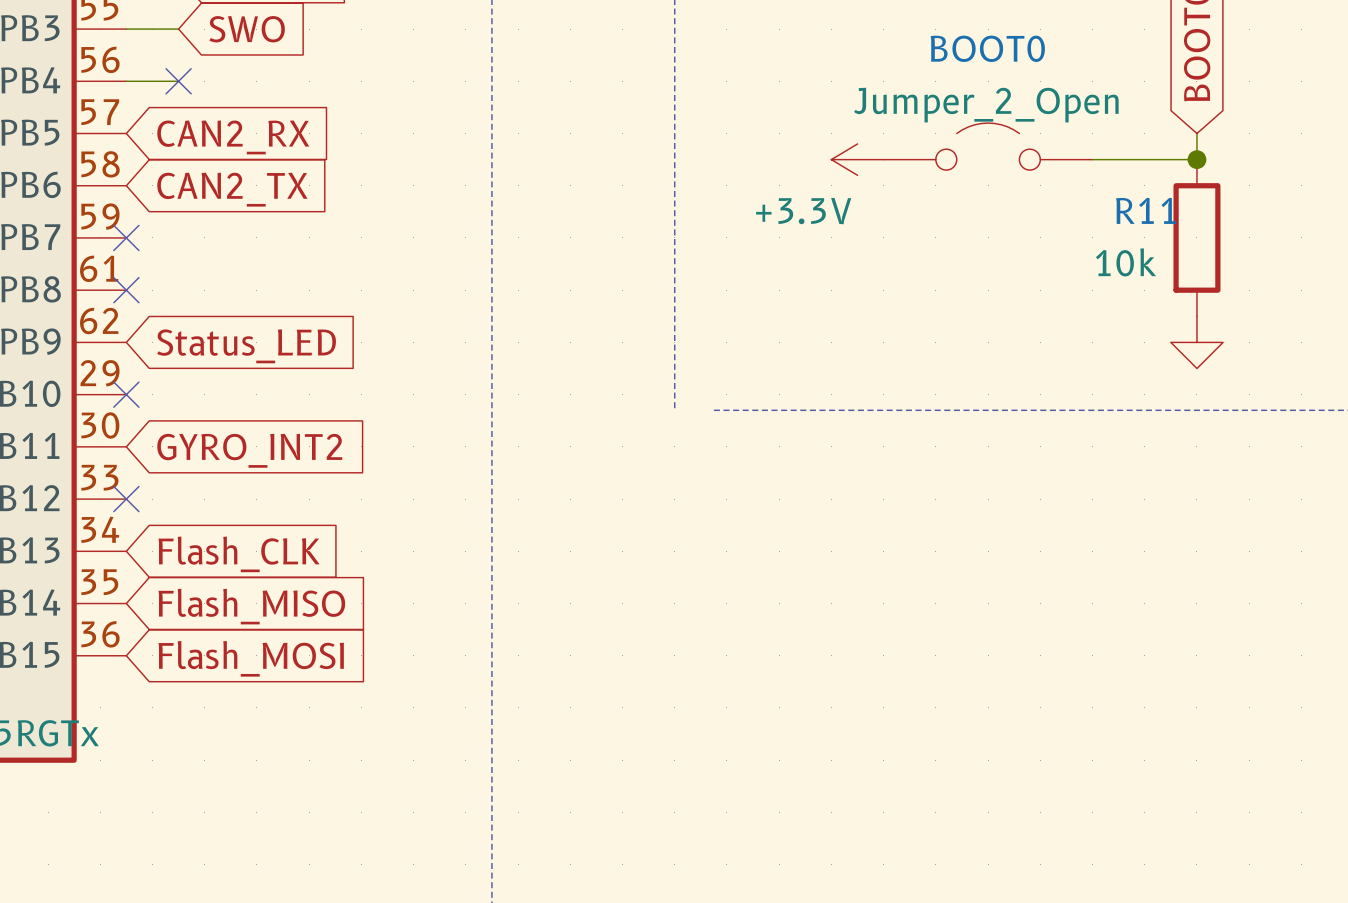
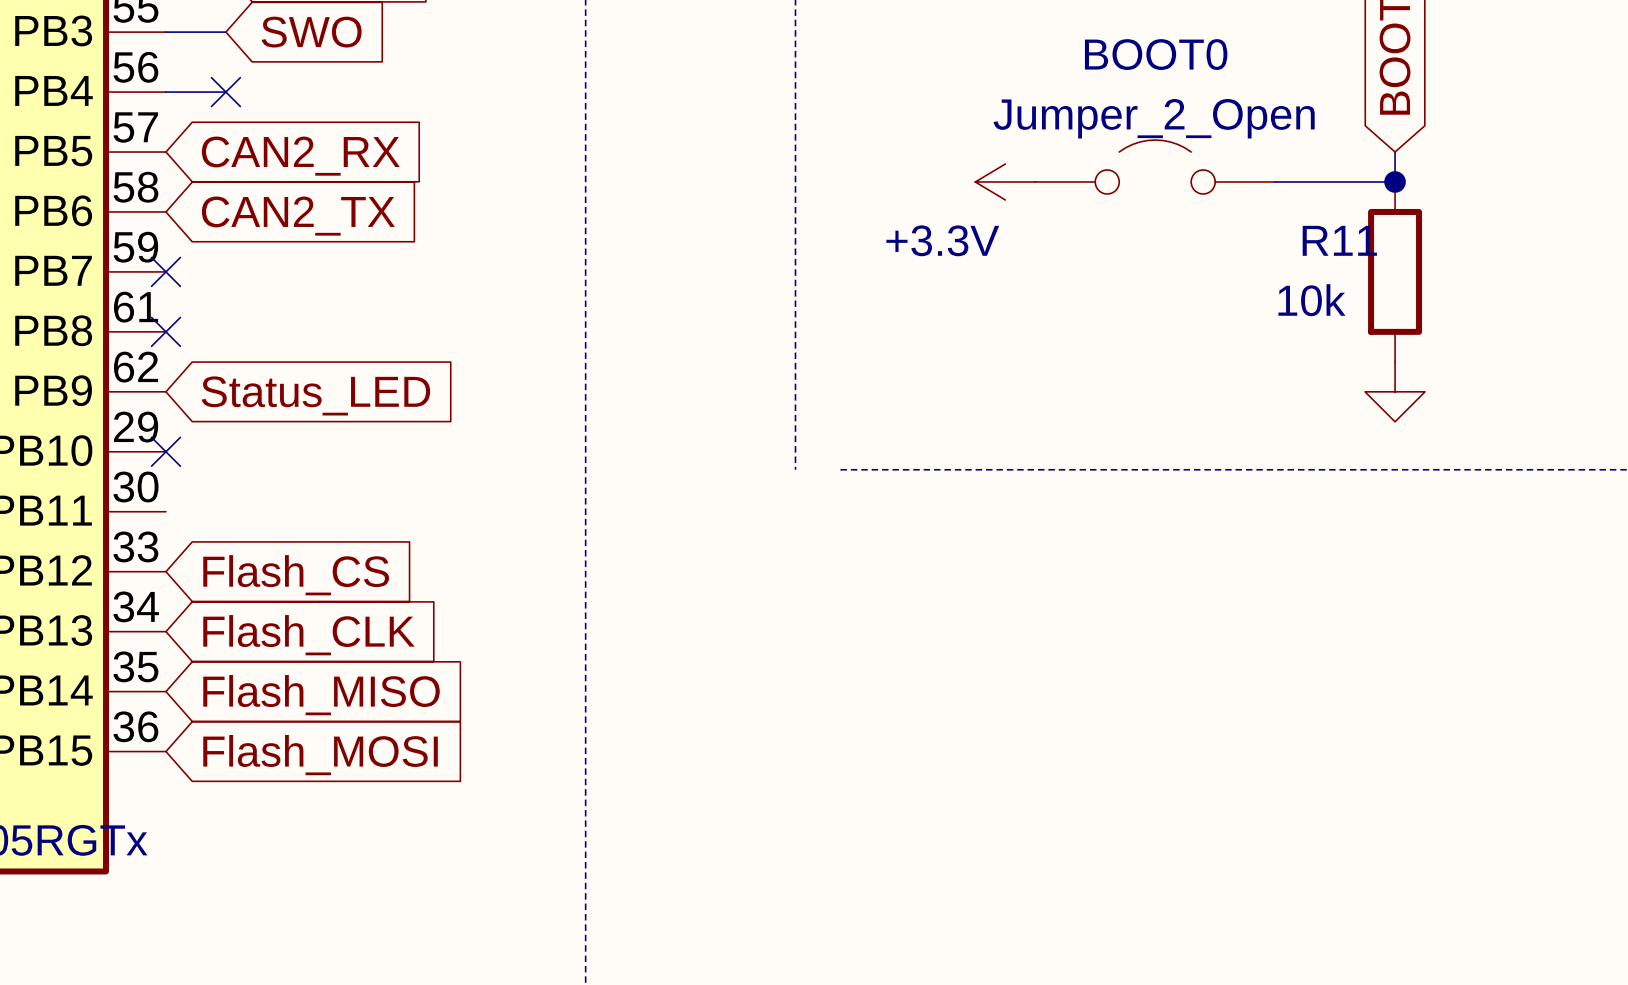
global label: GYRO_INT2 (249, 450) -> none
no-connect mark: (126, 499) -> none
global label: none -> Flash_CS (296, 575)

